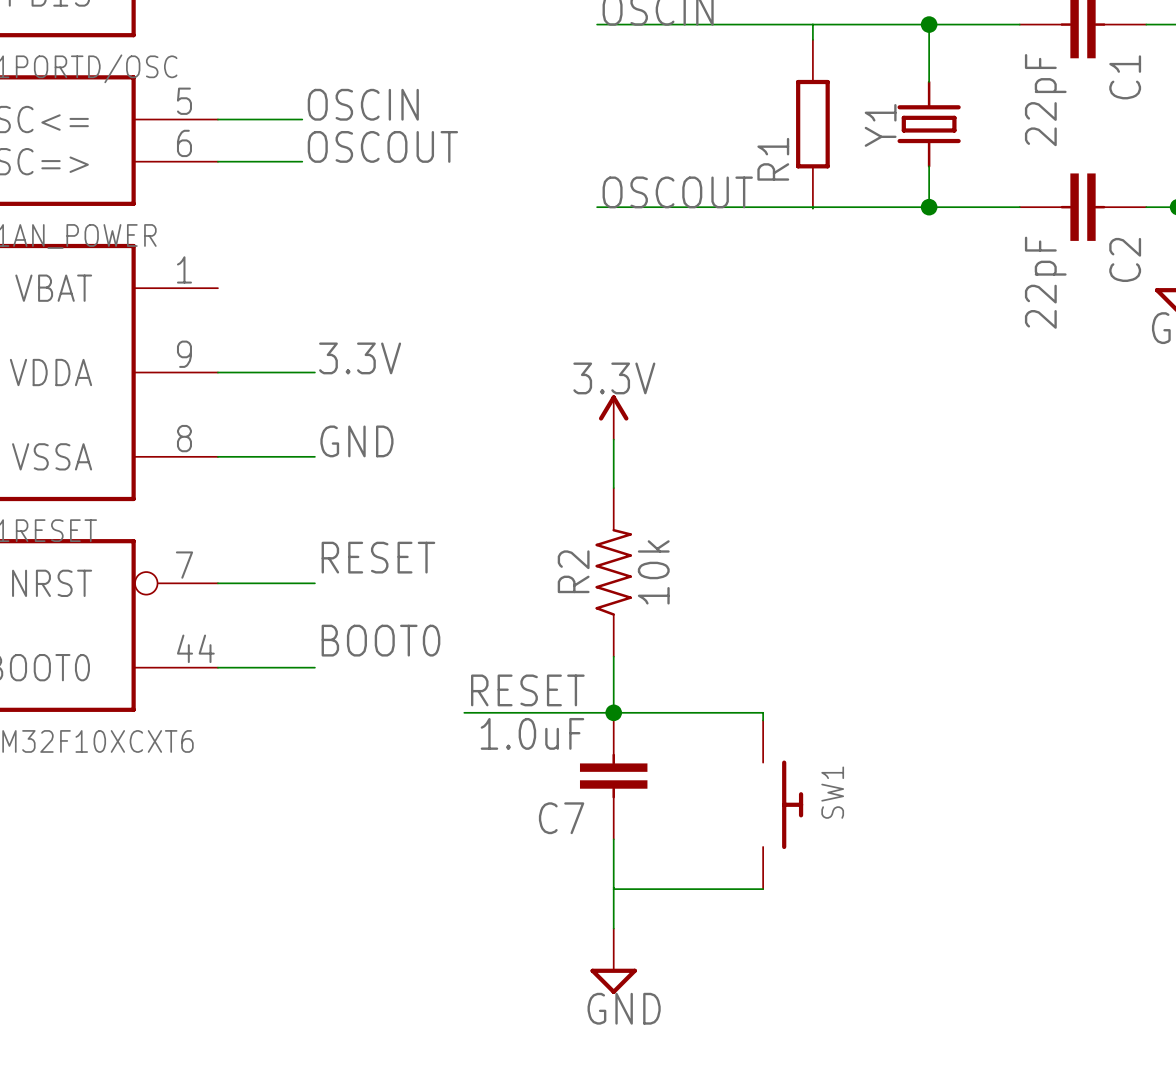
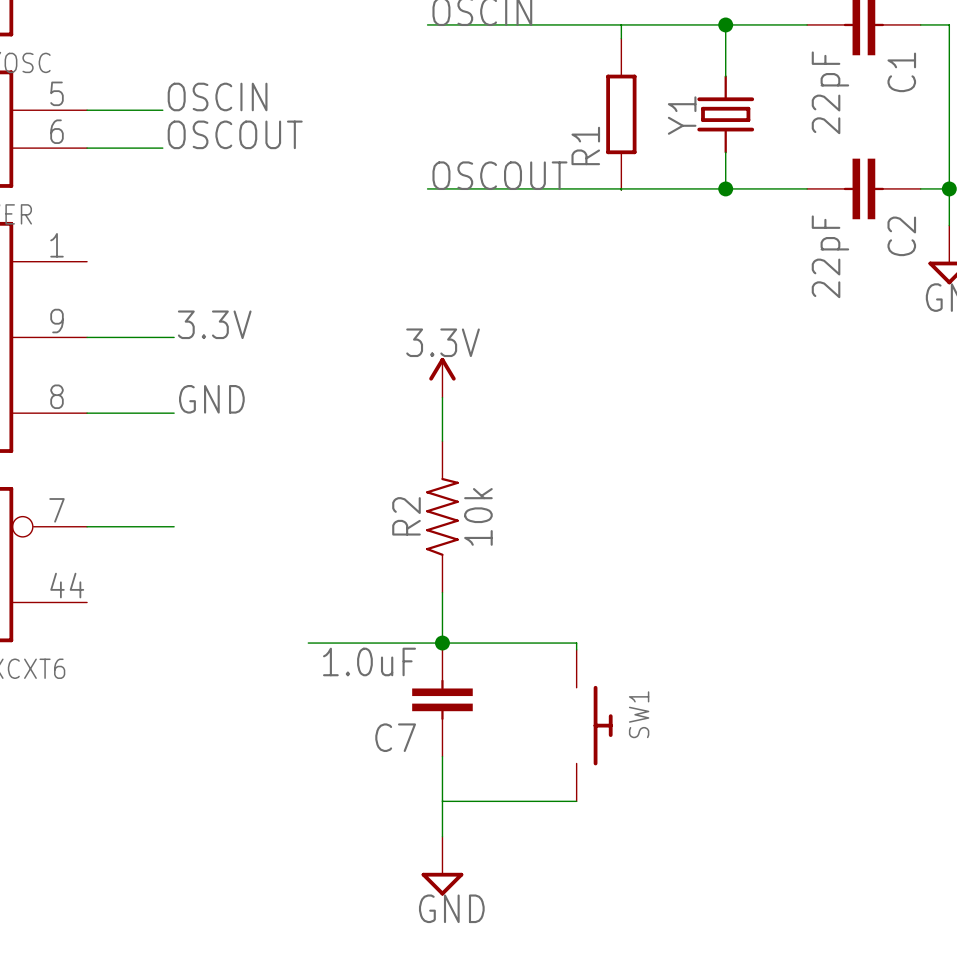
label: RESET (378, 557) -> none
label: BOOT0 (380, 640) -> none
wire: (217, 667) (314, 667) -> none
label: RESET (527, 690) -> none

